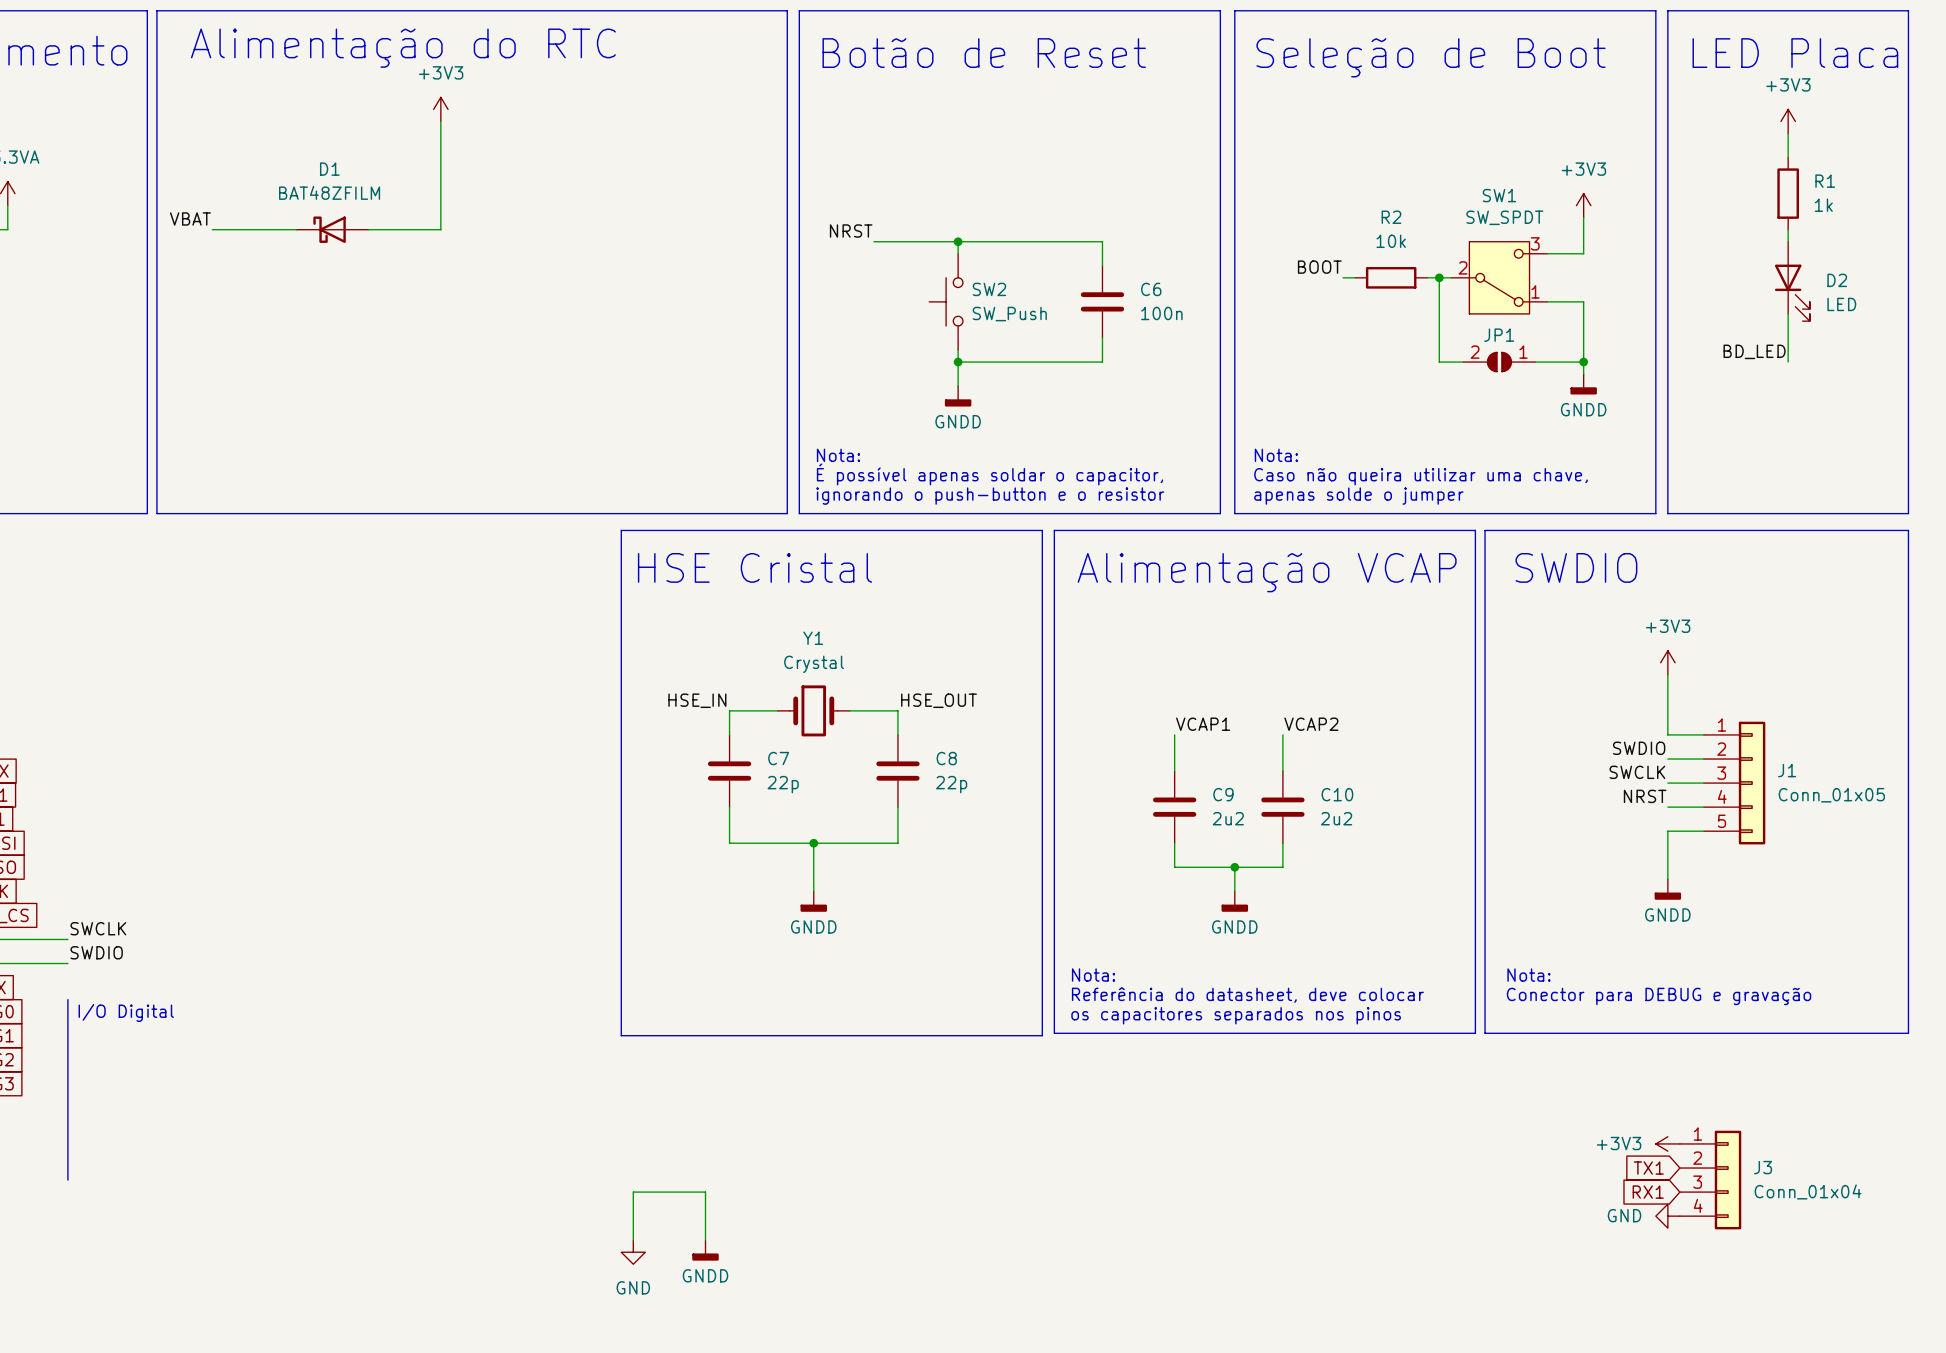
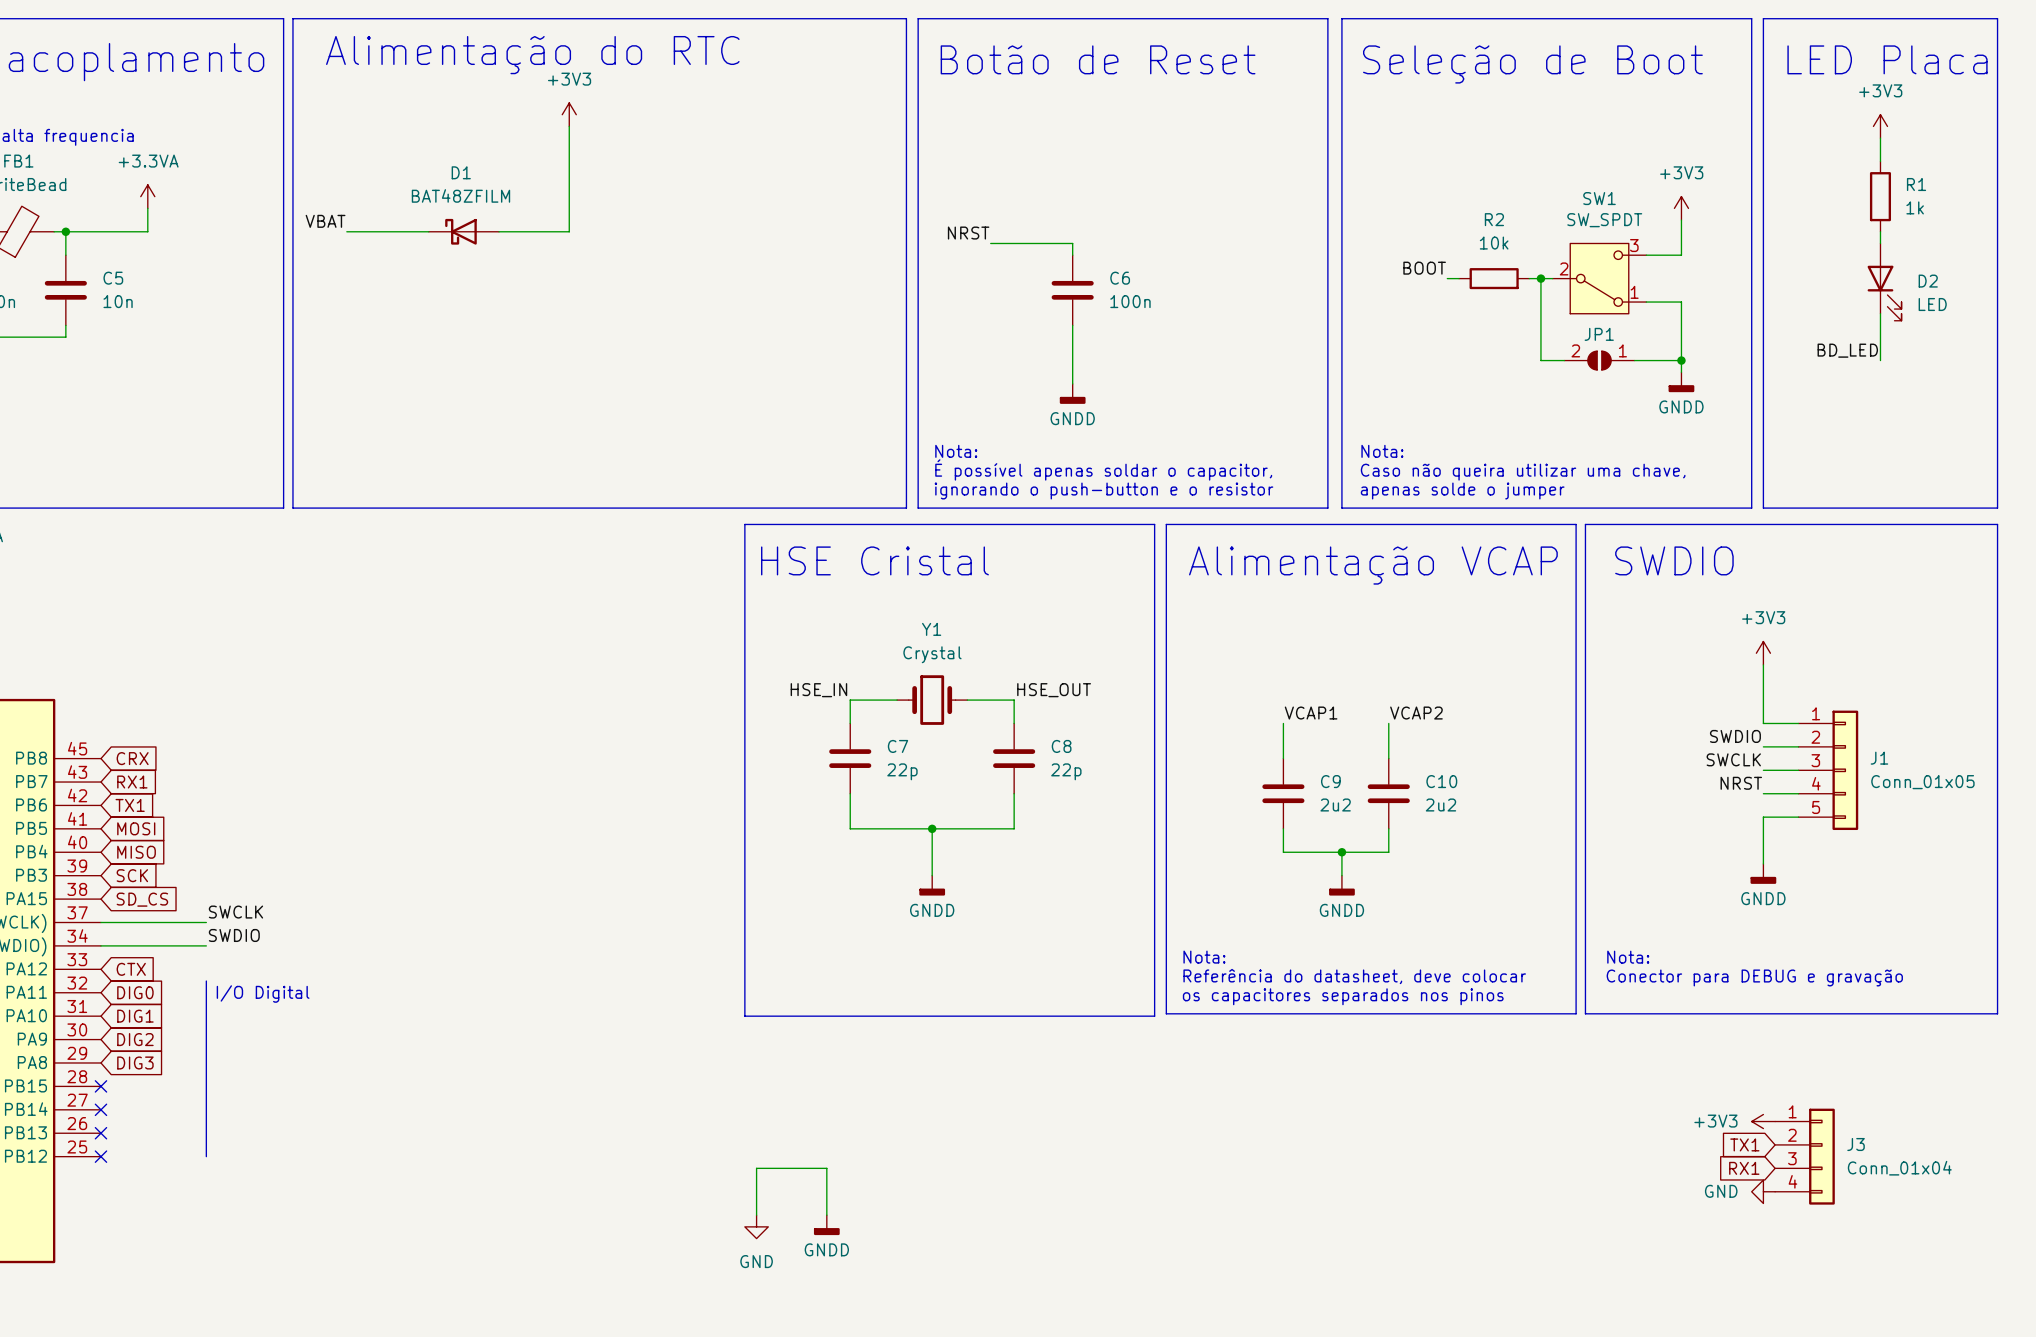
wire: (958, 241) (1102, 241) (1102, 265) -> none
junction: (958, 241) -> none
SW2: SW_Push (946, 301) -> none
C6 position: (1102, 301) -> (1072, 290)
wire: (1102, 337) (1102, 362) (958, 362) -> none
junction: (958, 362) -> none

